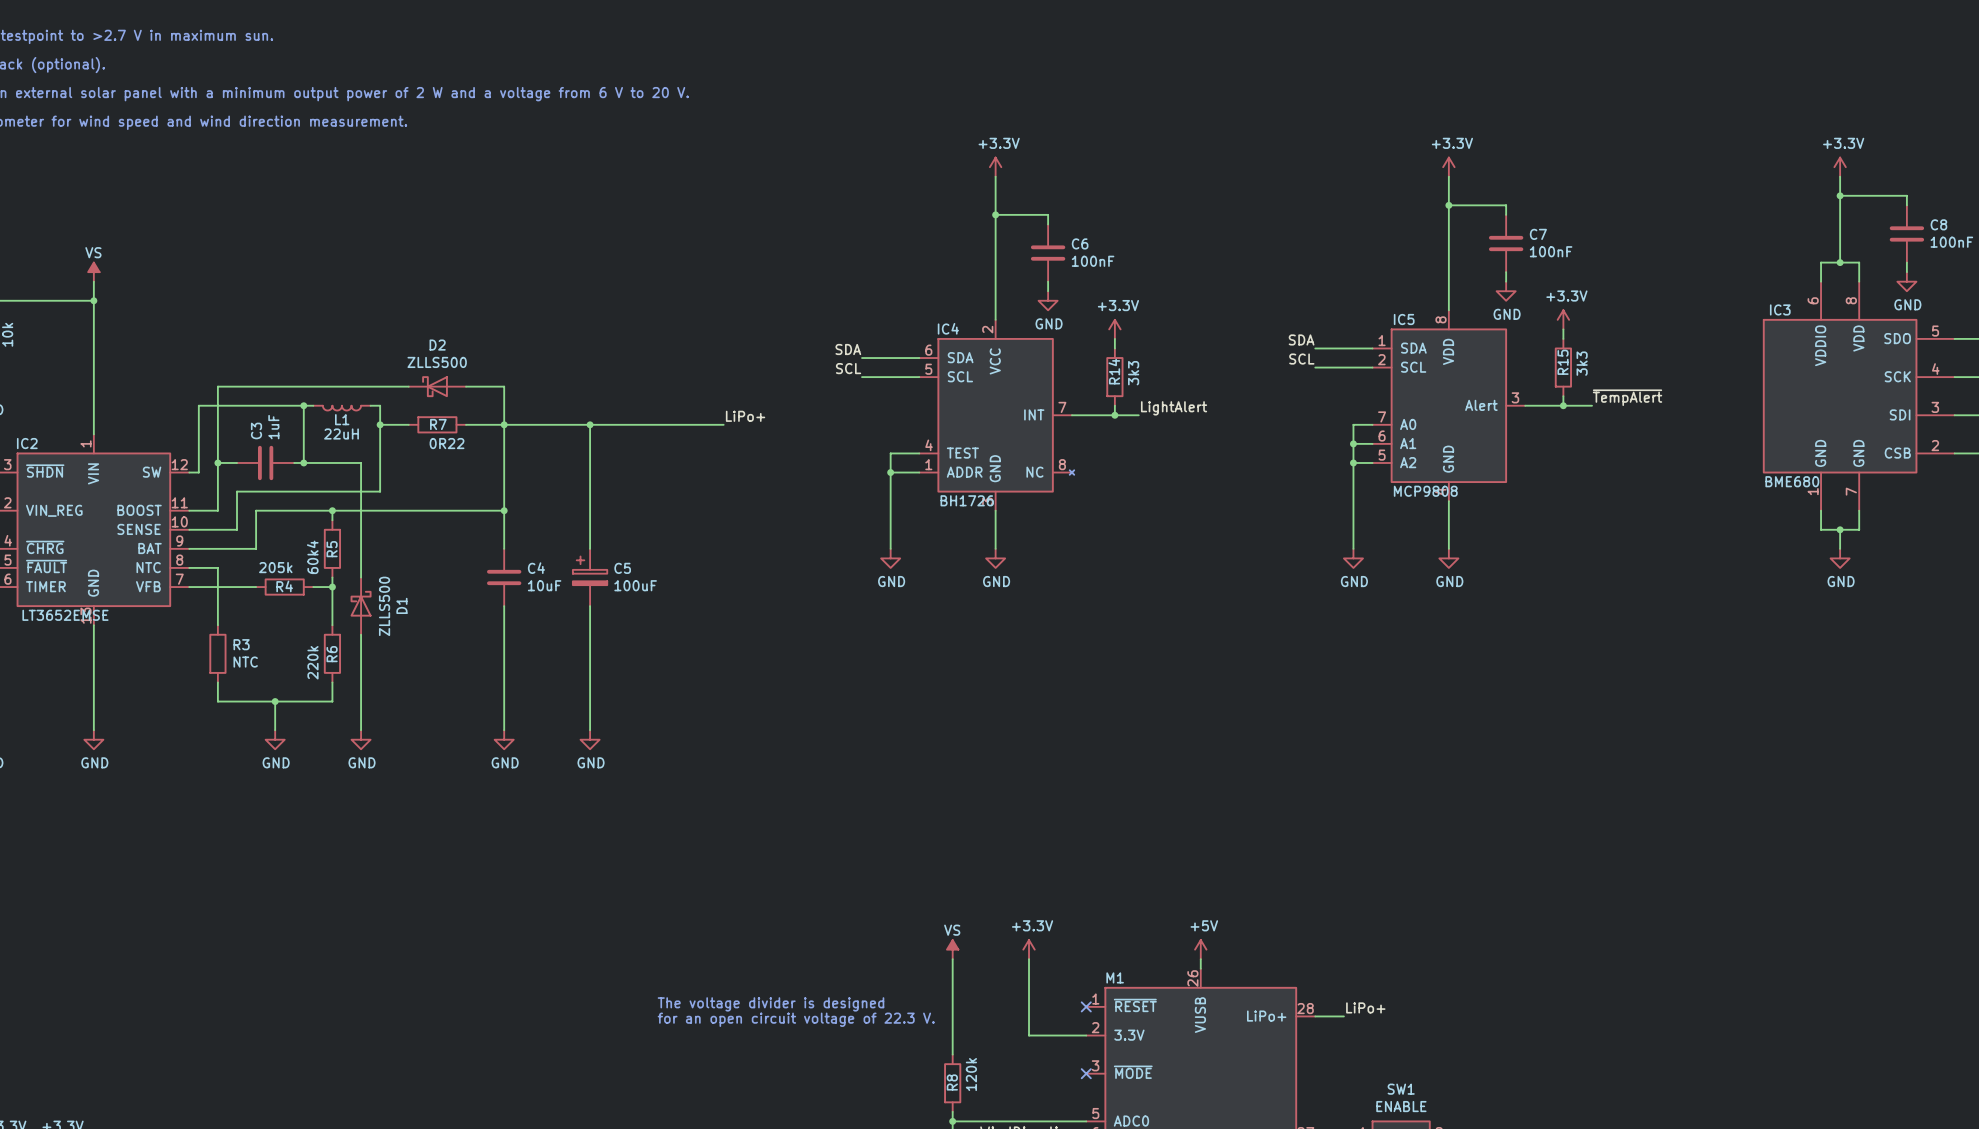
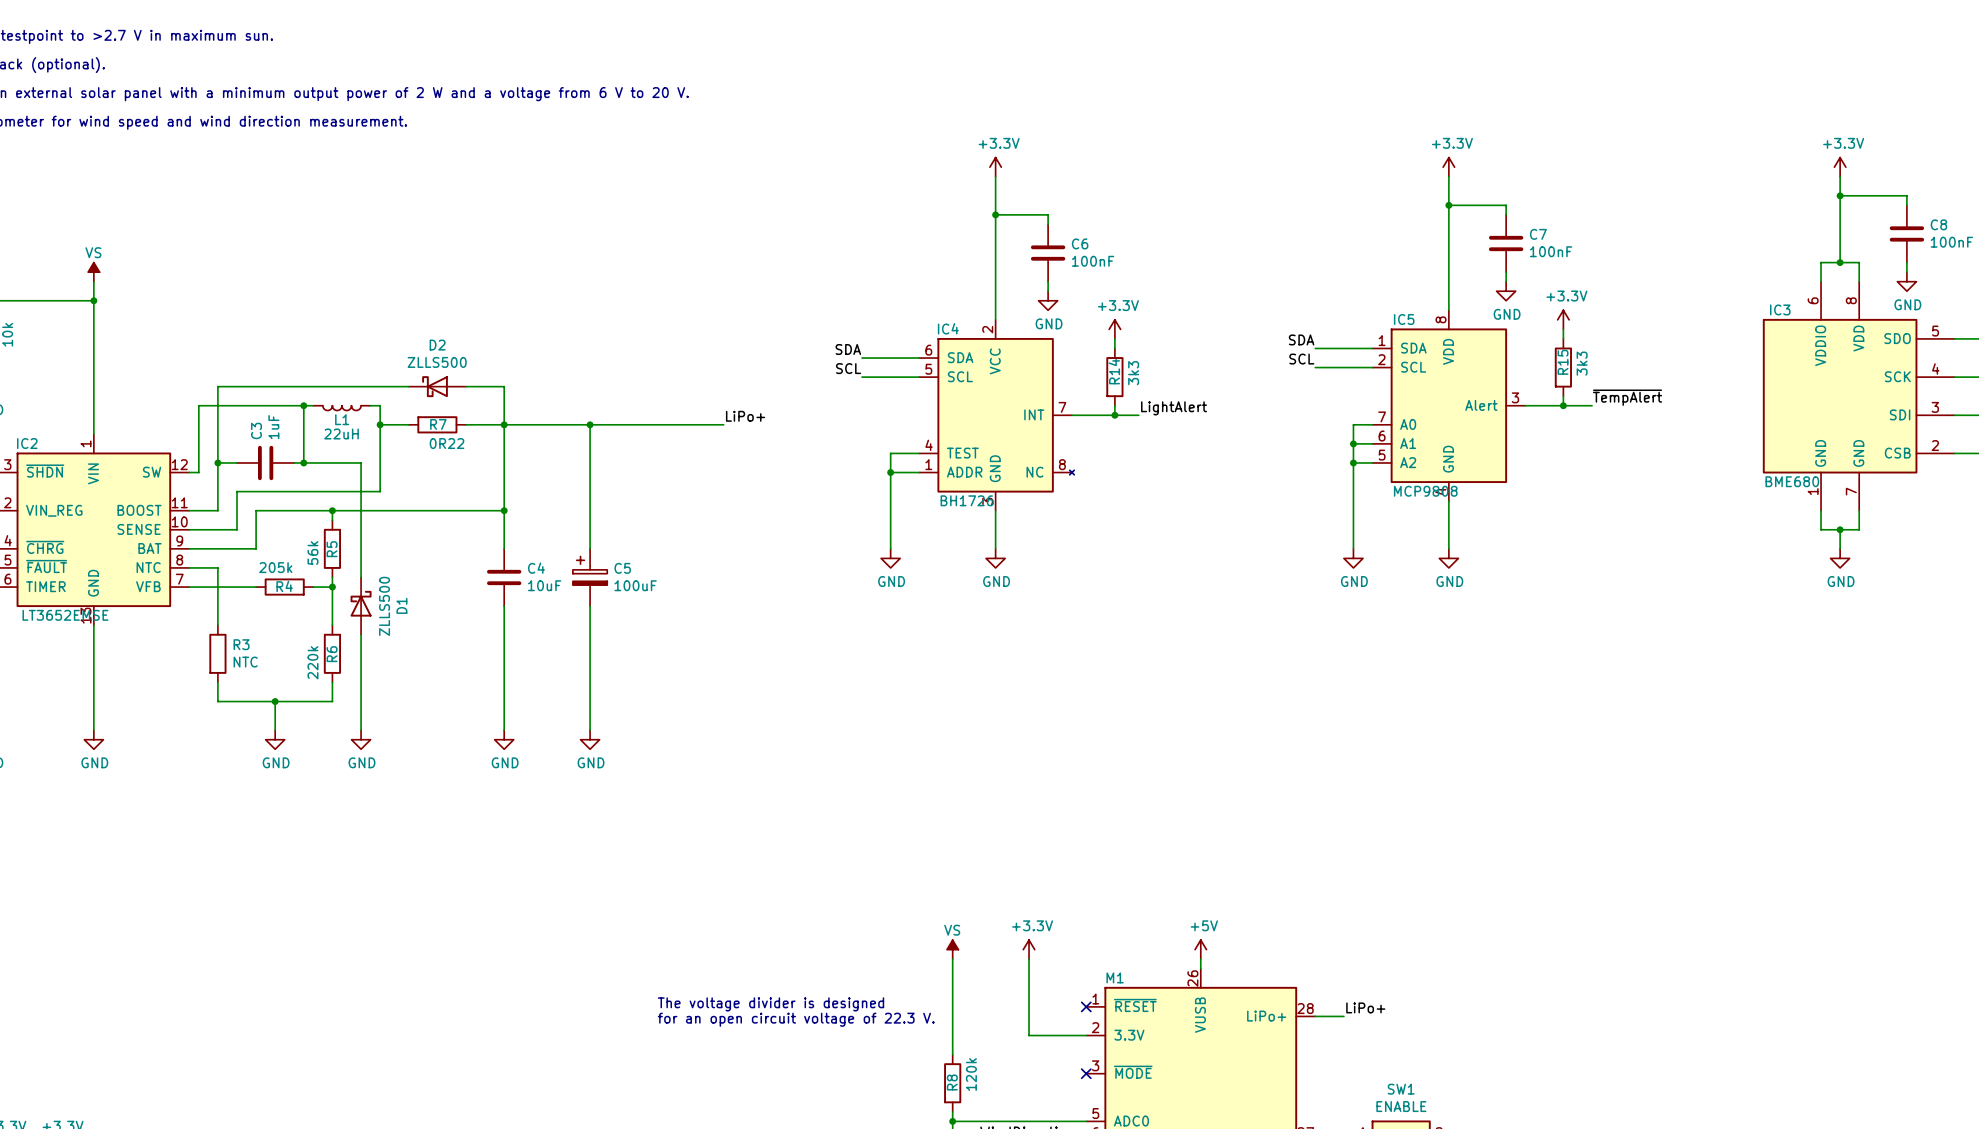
R5 value: 60k4 (312, 557) -> 56k (312, 553)

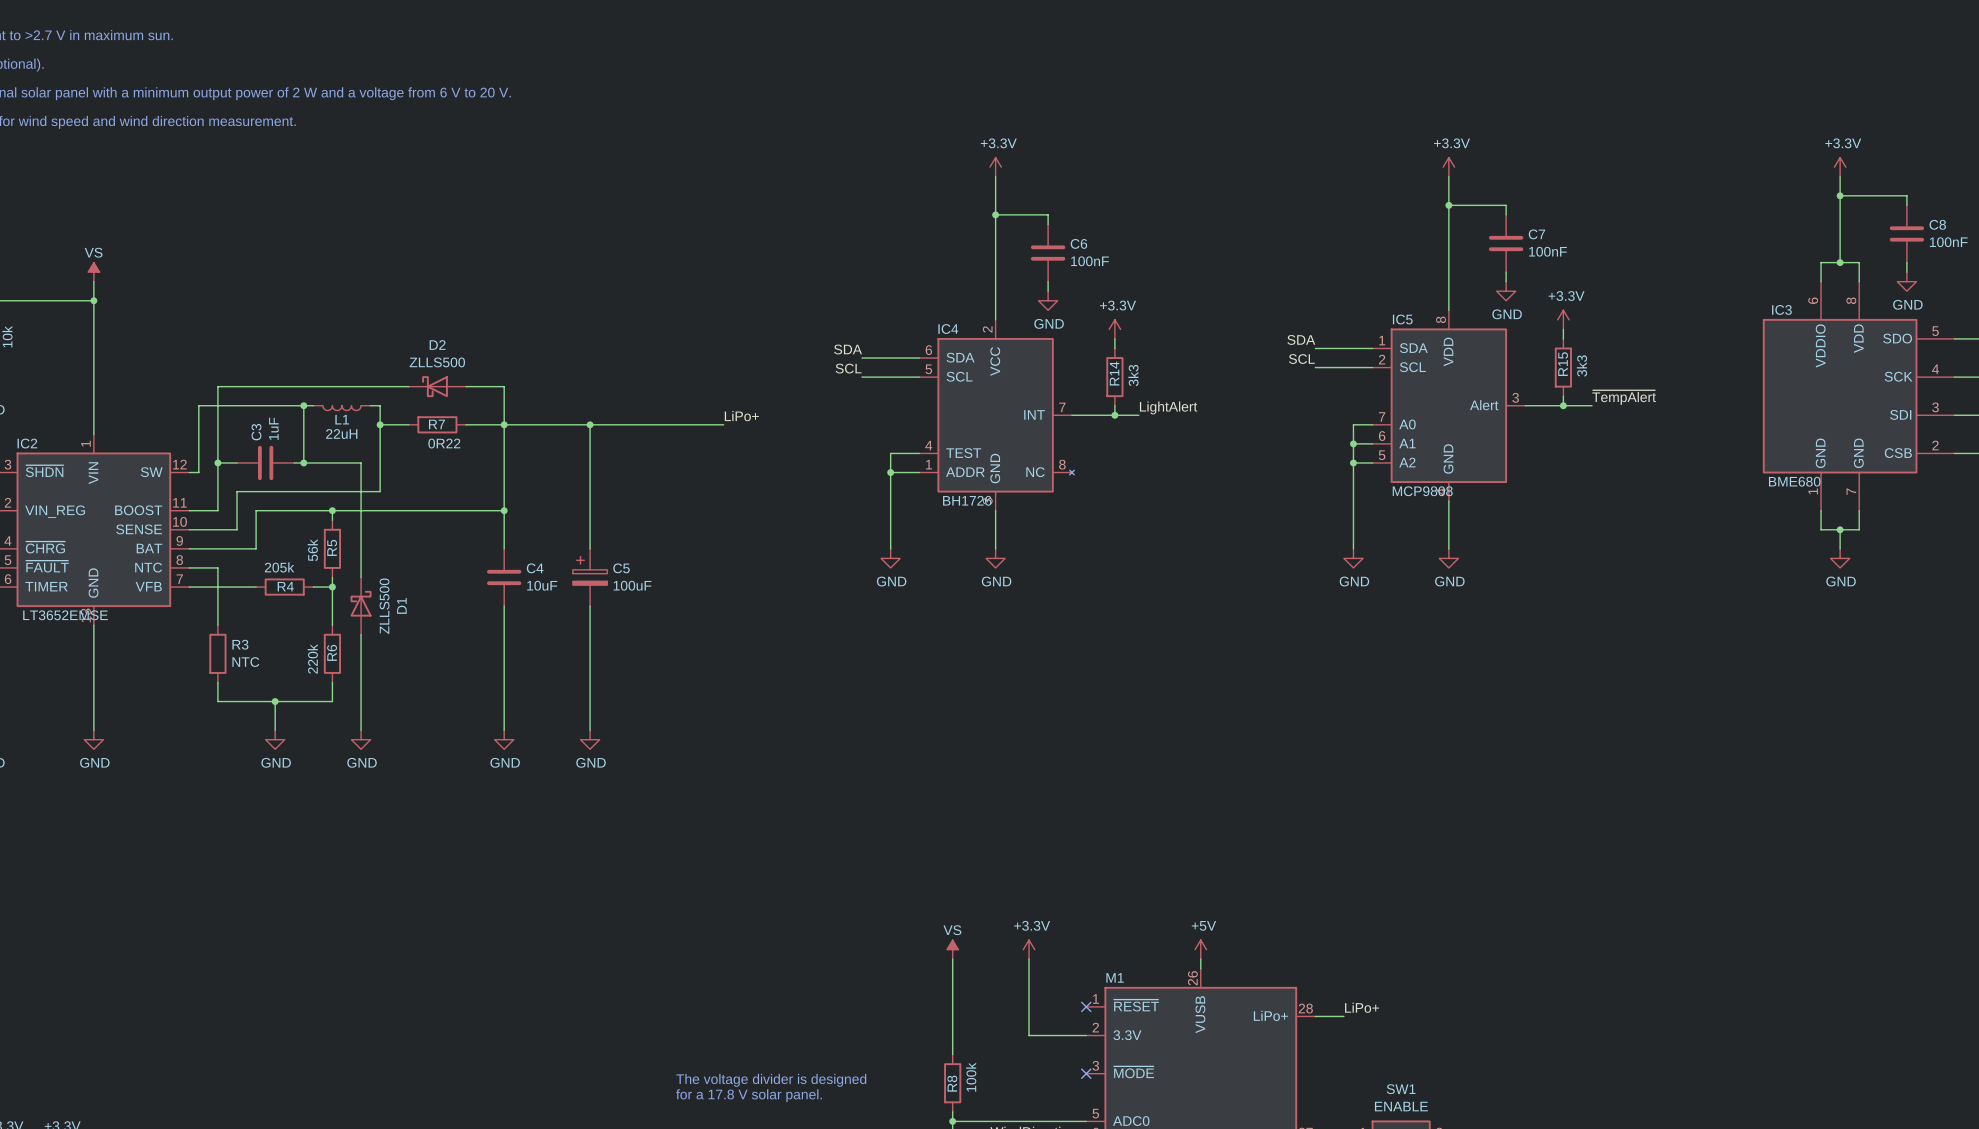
text position: The voltage divider is designed (770, 1004) -> The voltage divider is designed (771, 1080)
text: for an open circuit voltage of 22.3 V. (796, 1019) -> none
R8 value: 120k (971, 1074) -> 100k (971, 1077)
text: none -> for a 17.8 V solar panel. (749, 1095)

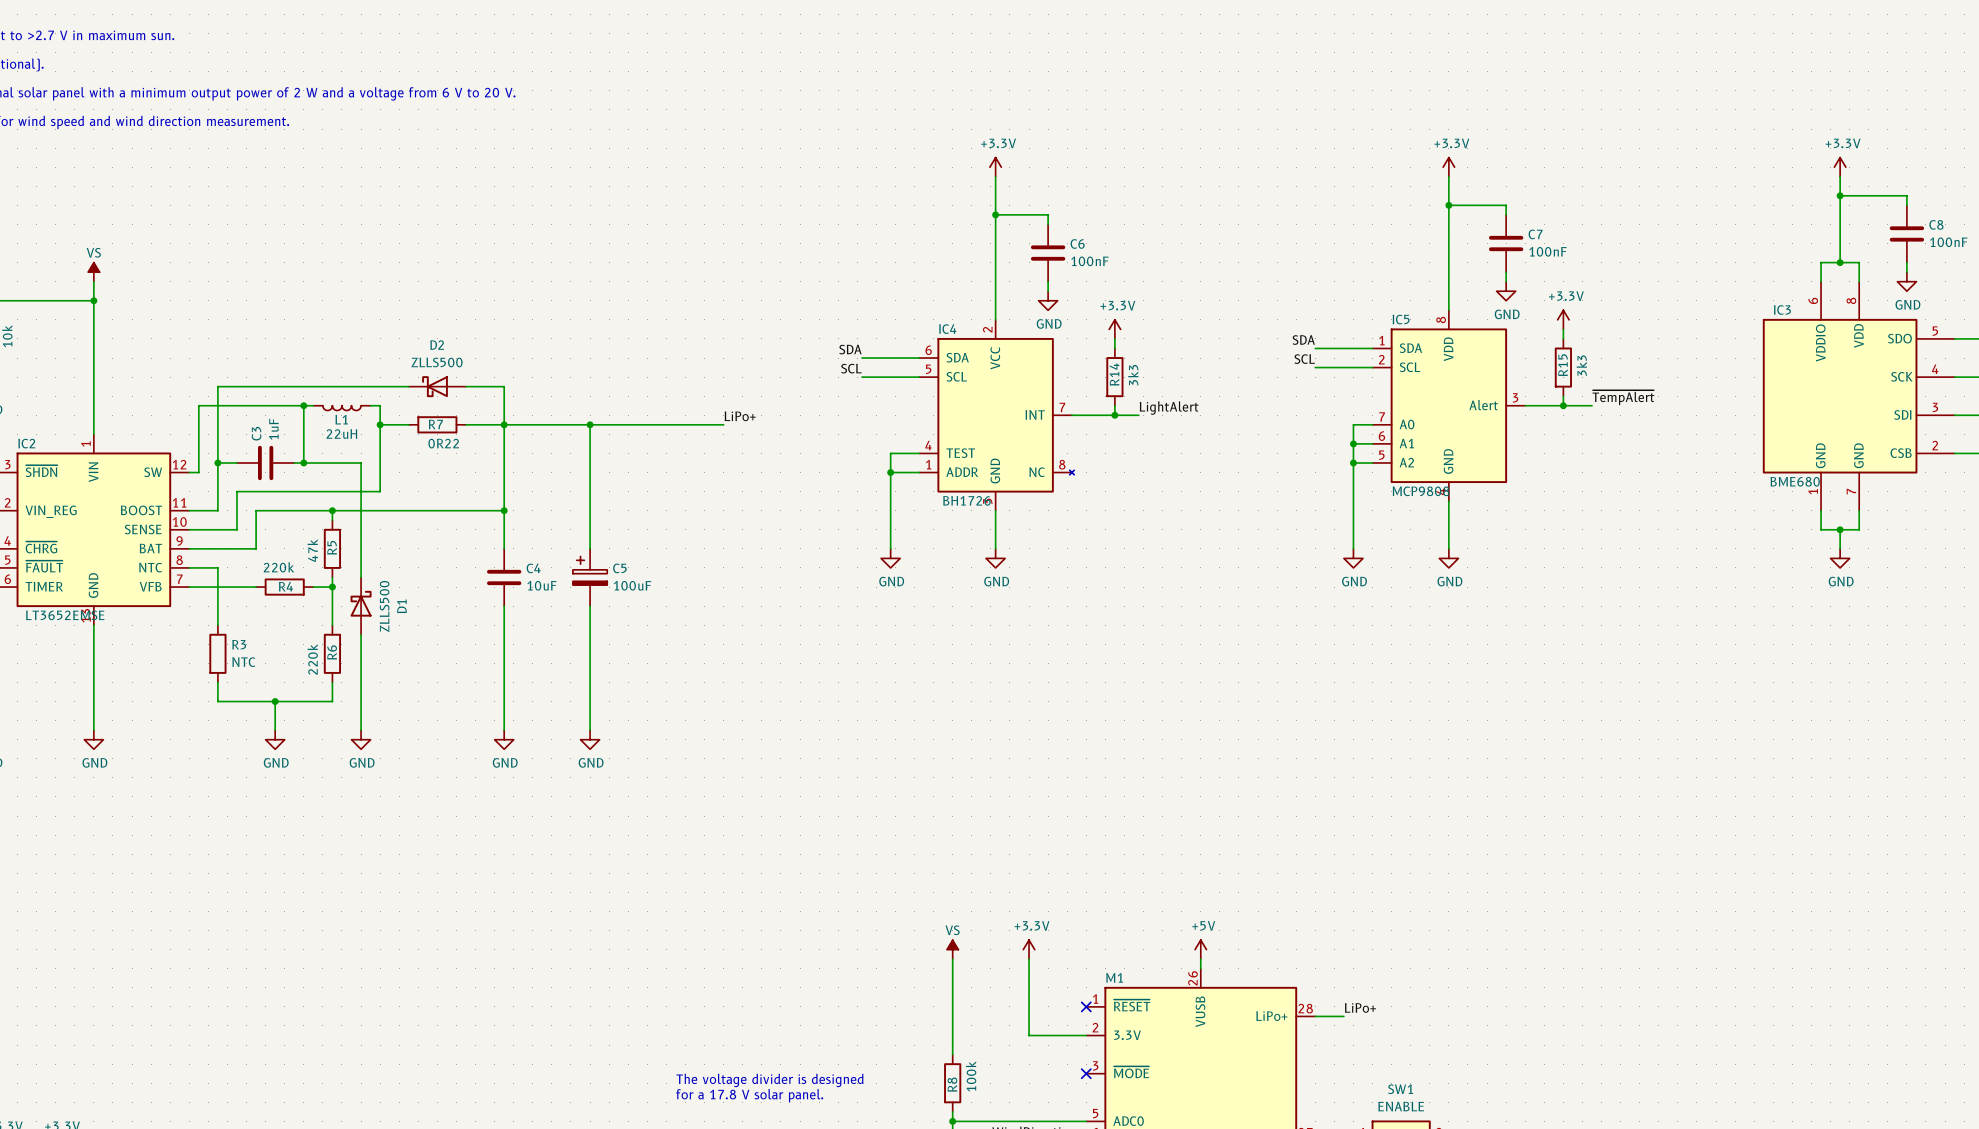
R5 value: 56k (312, 550) -> 47k (312, 550)
R4 value: 205k (279, 567) -> 220k (279, 567)

